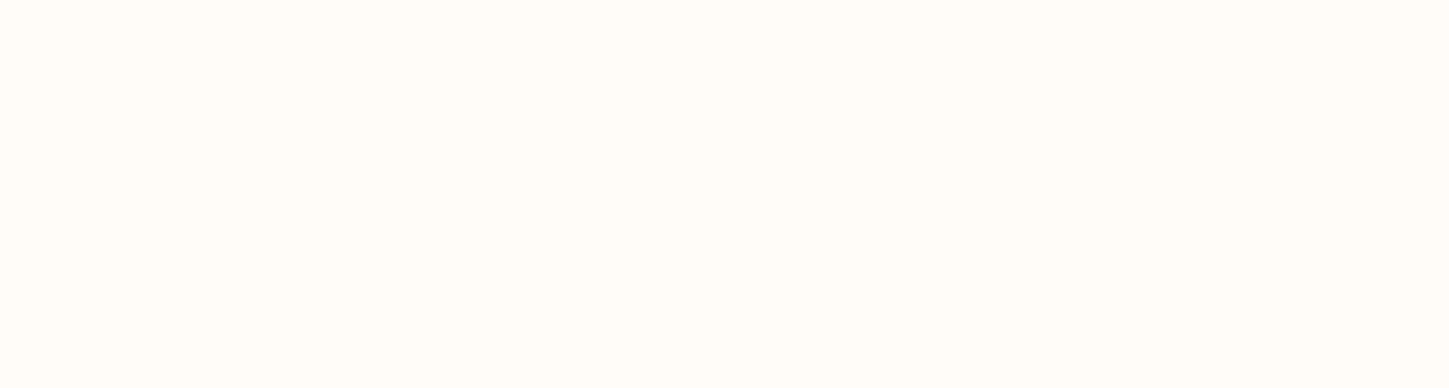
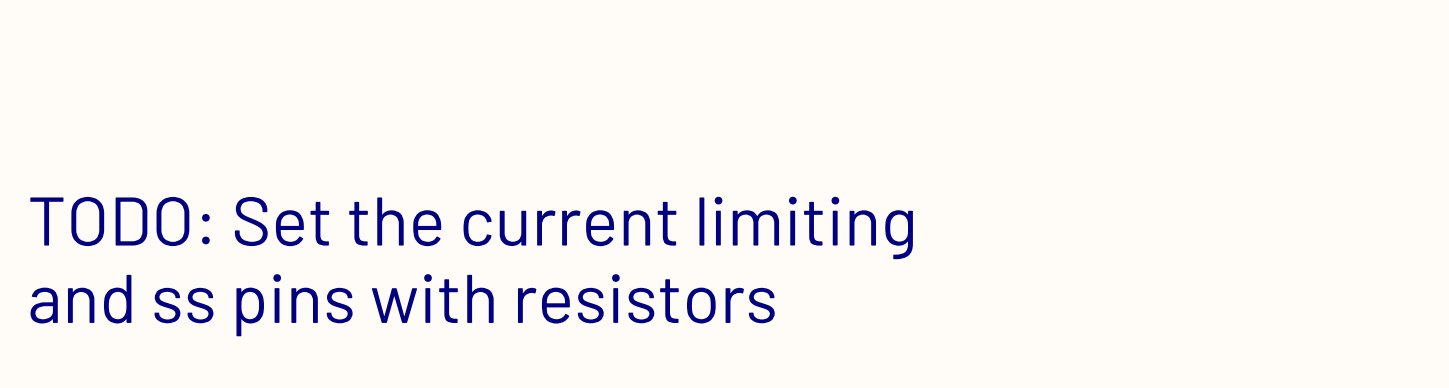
text: none -> TODO: Set the current limiting (471, 227)
text: none -> and ss pins with resistors (402, 305)

